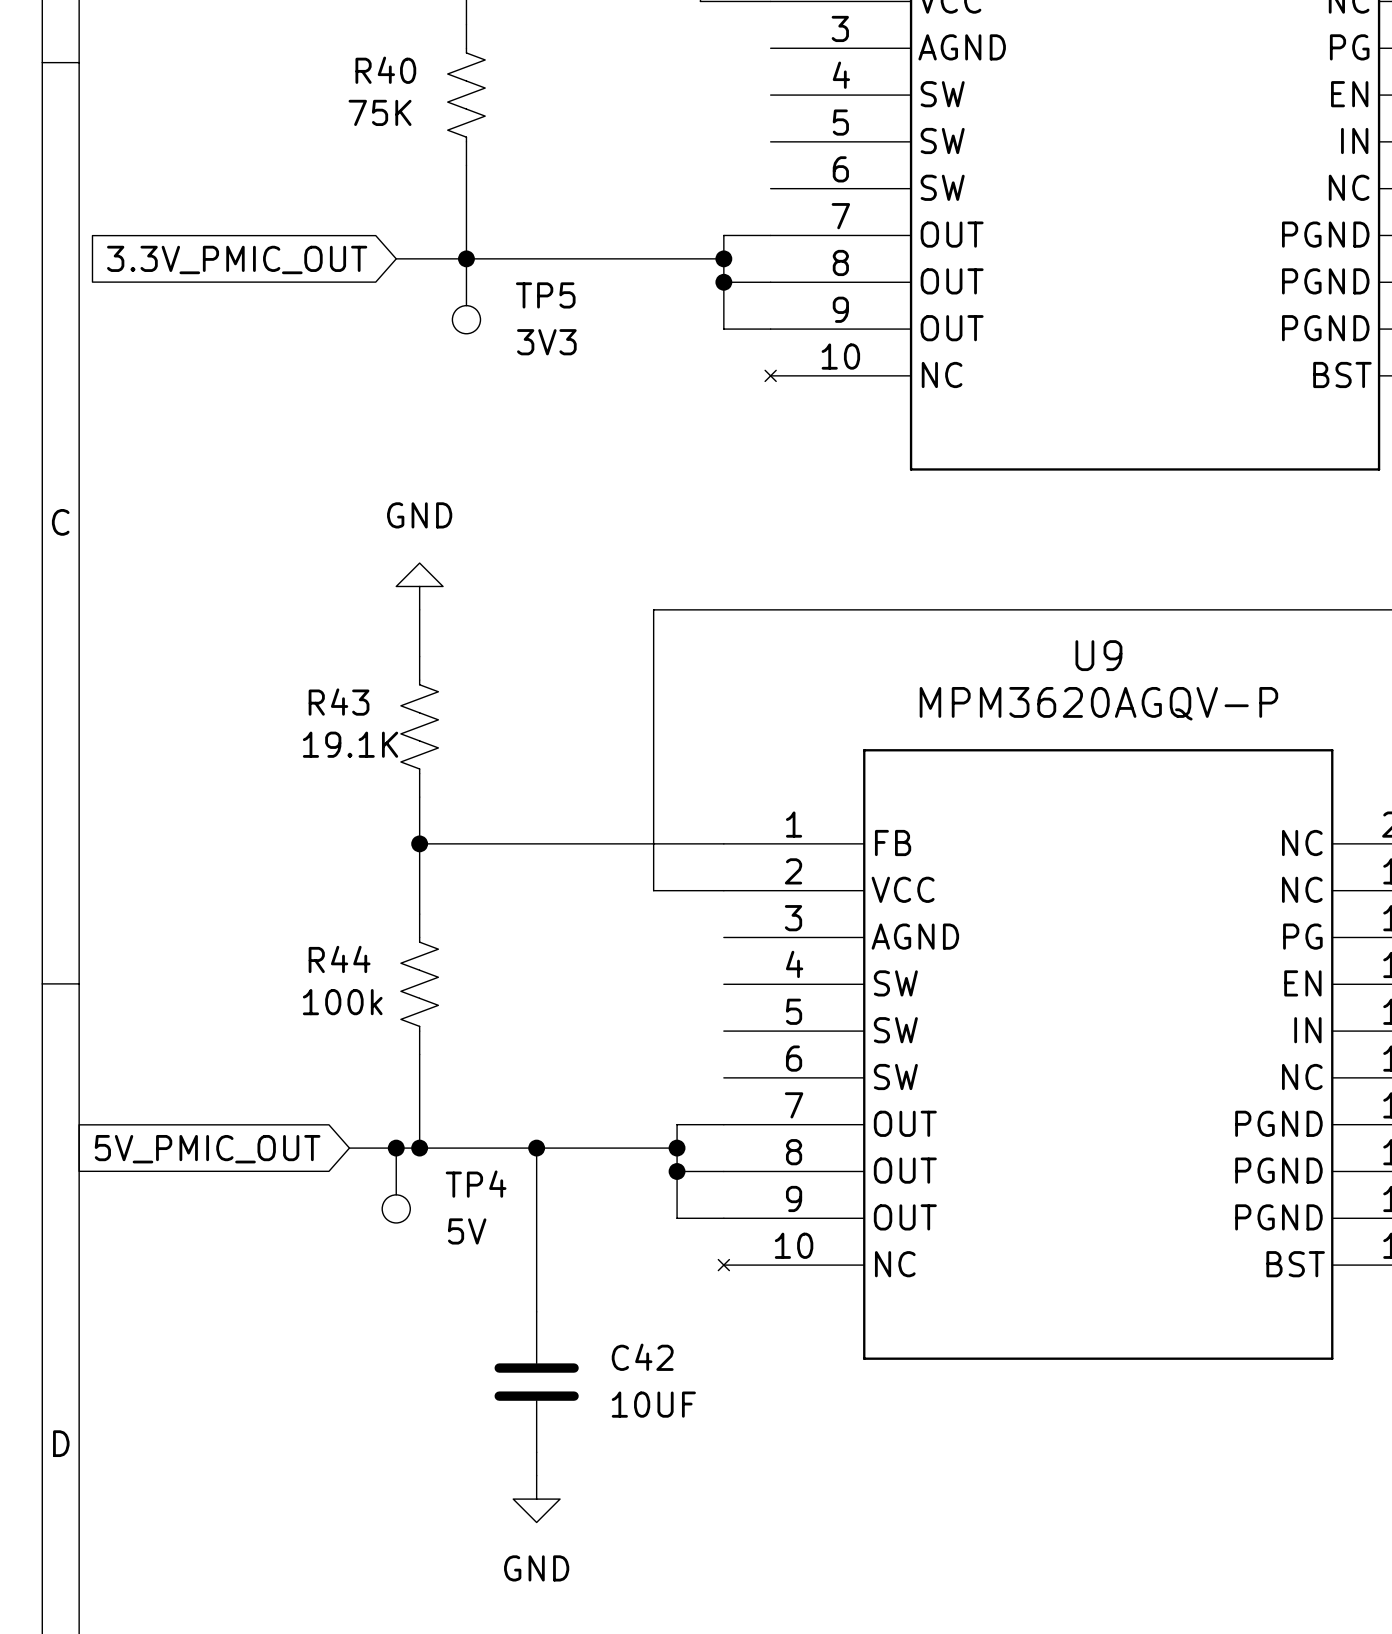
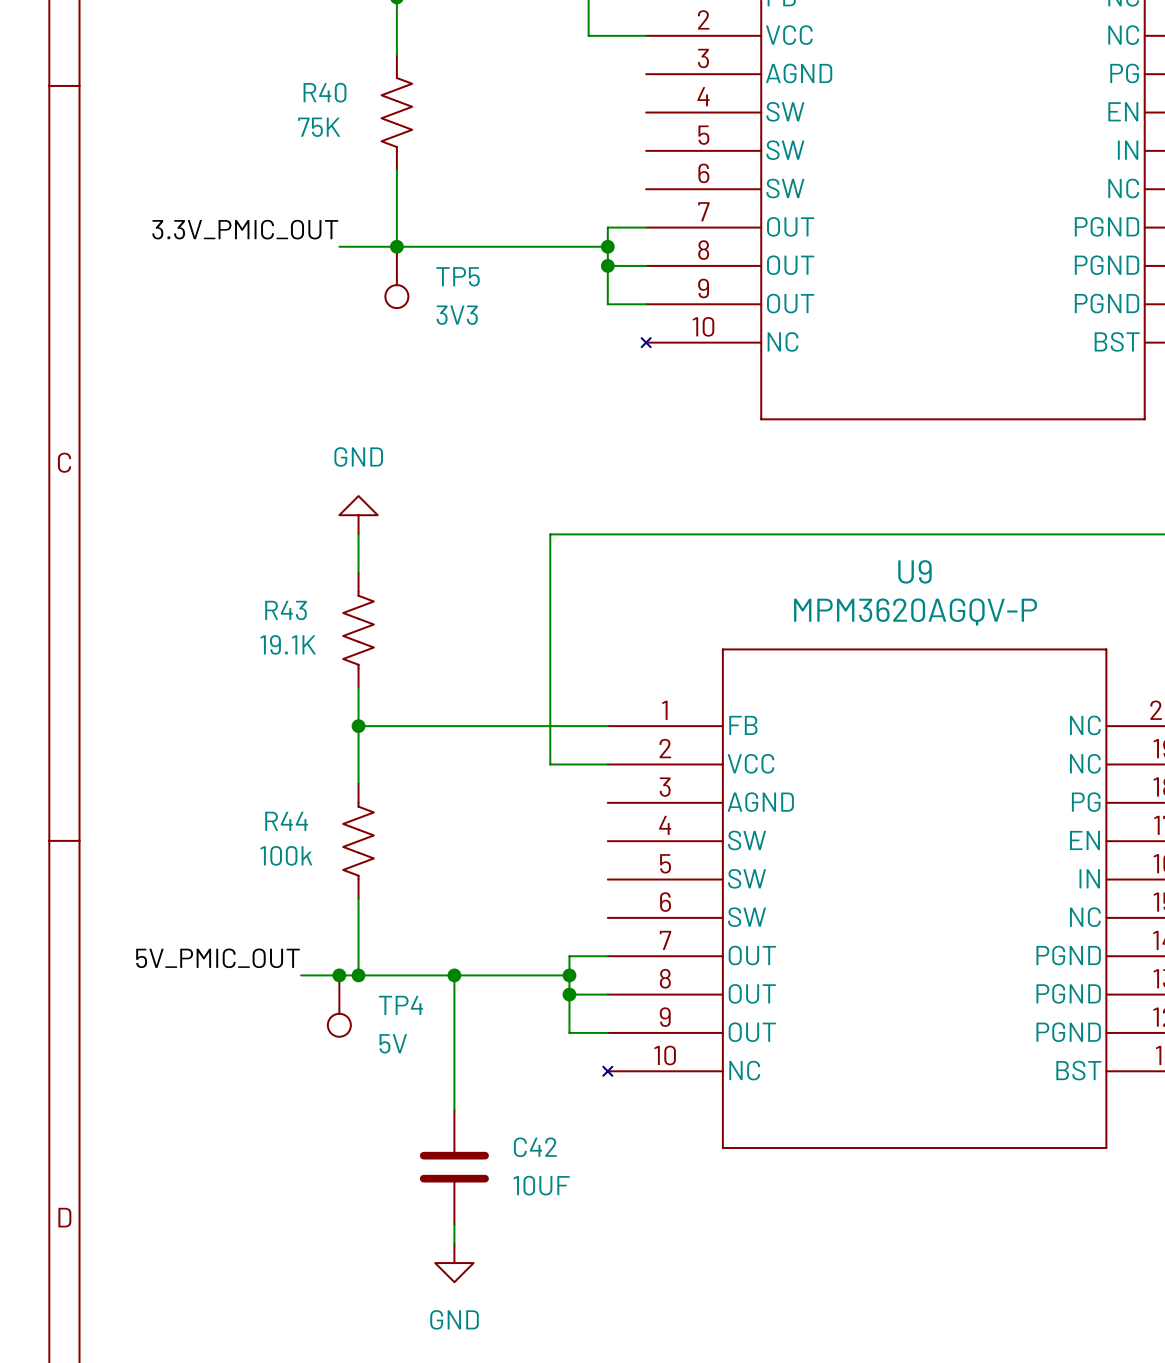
label: none -> 3.3V_PMIC_OUT (245, 229)
global label: 3.3V_PMIC_OUT (237, 259) -> none
label: none -> 5V_PMIC_OUT (218, 958)
global label: 5V_PMIC_OUT (207, 1149) -> none

